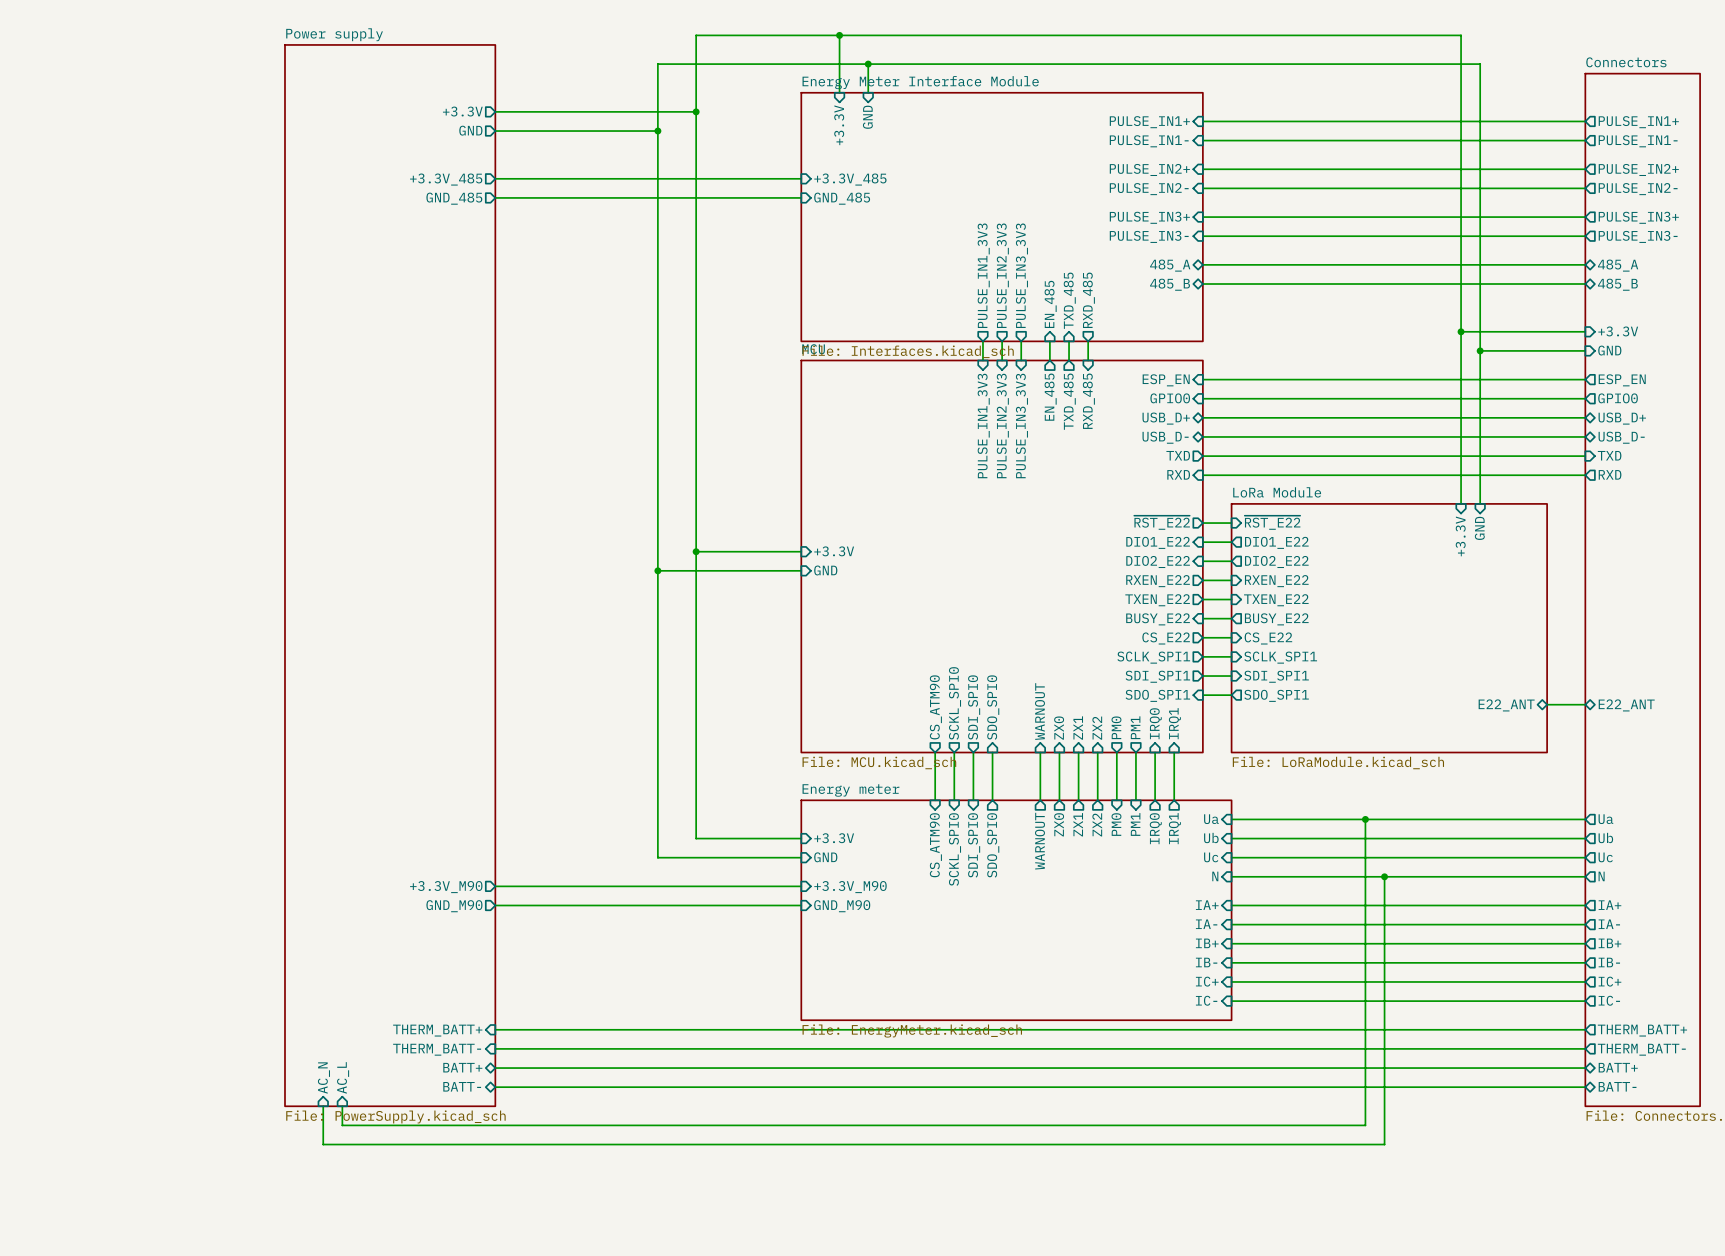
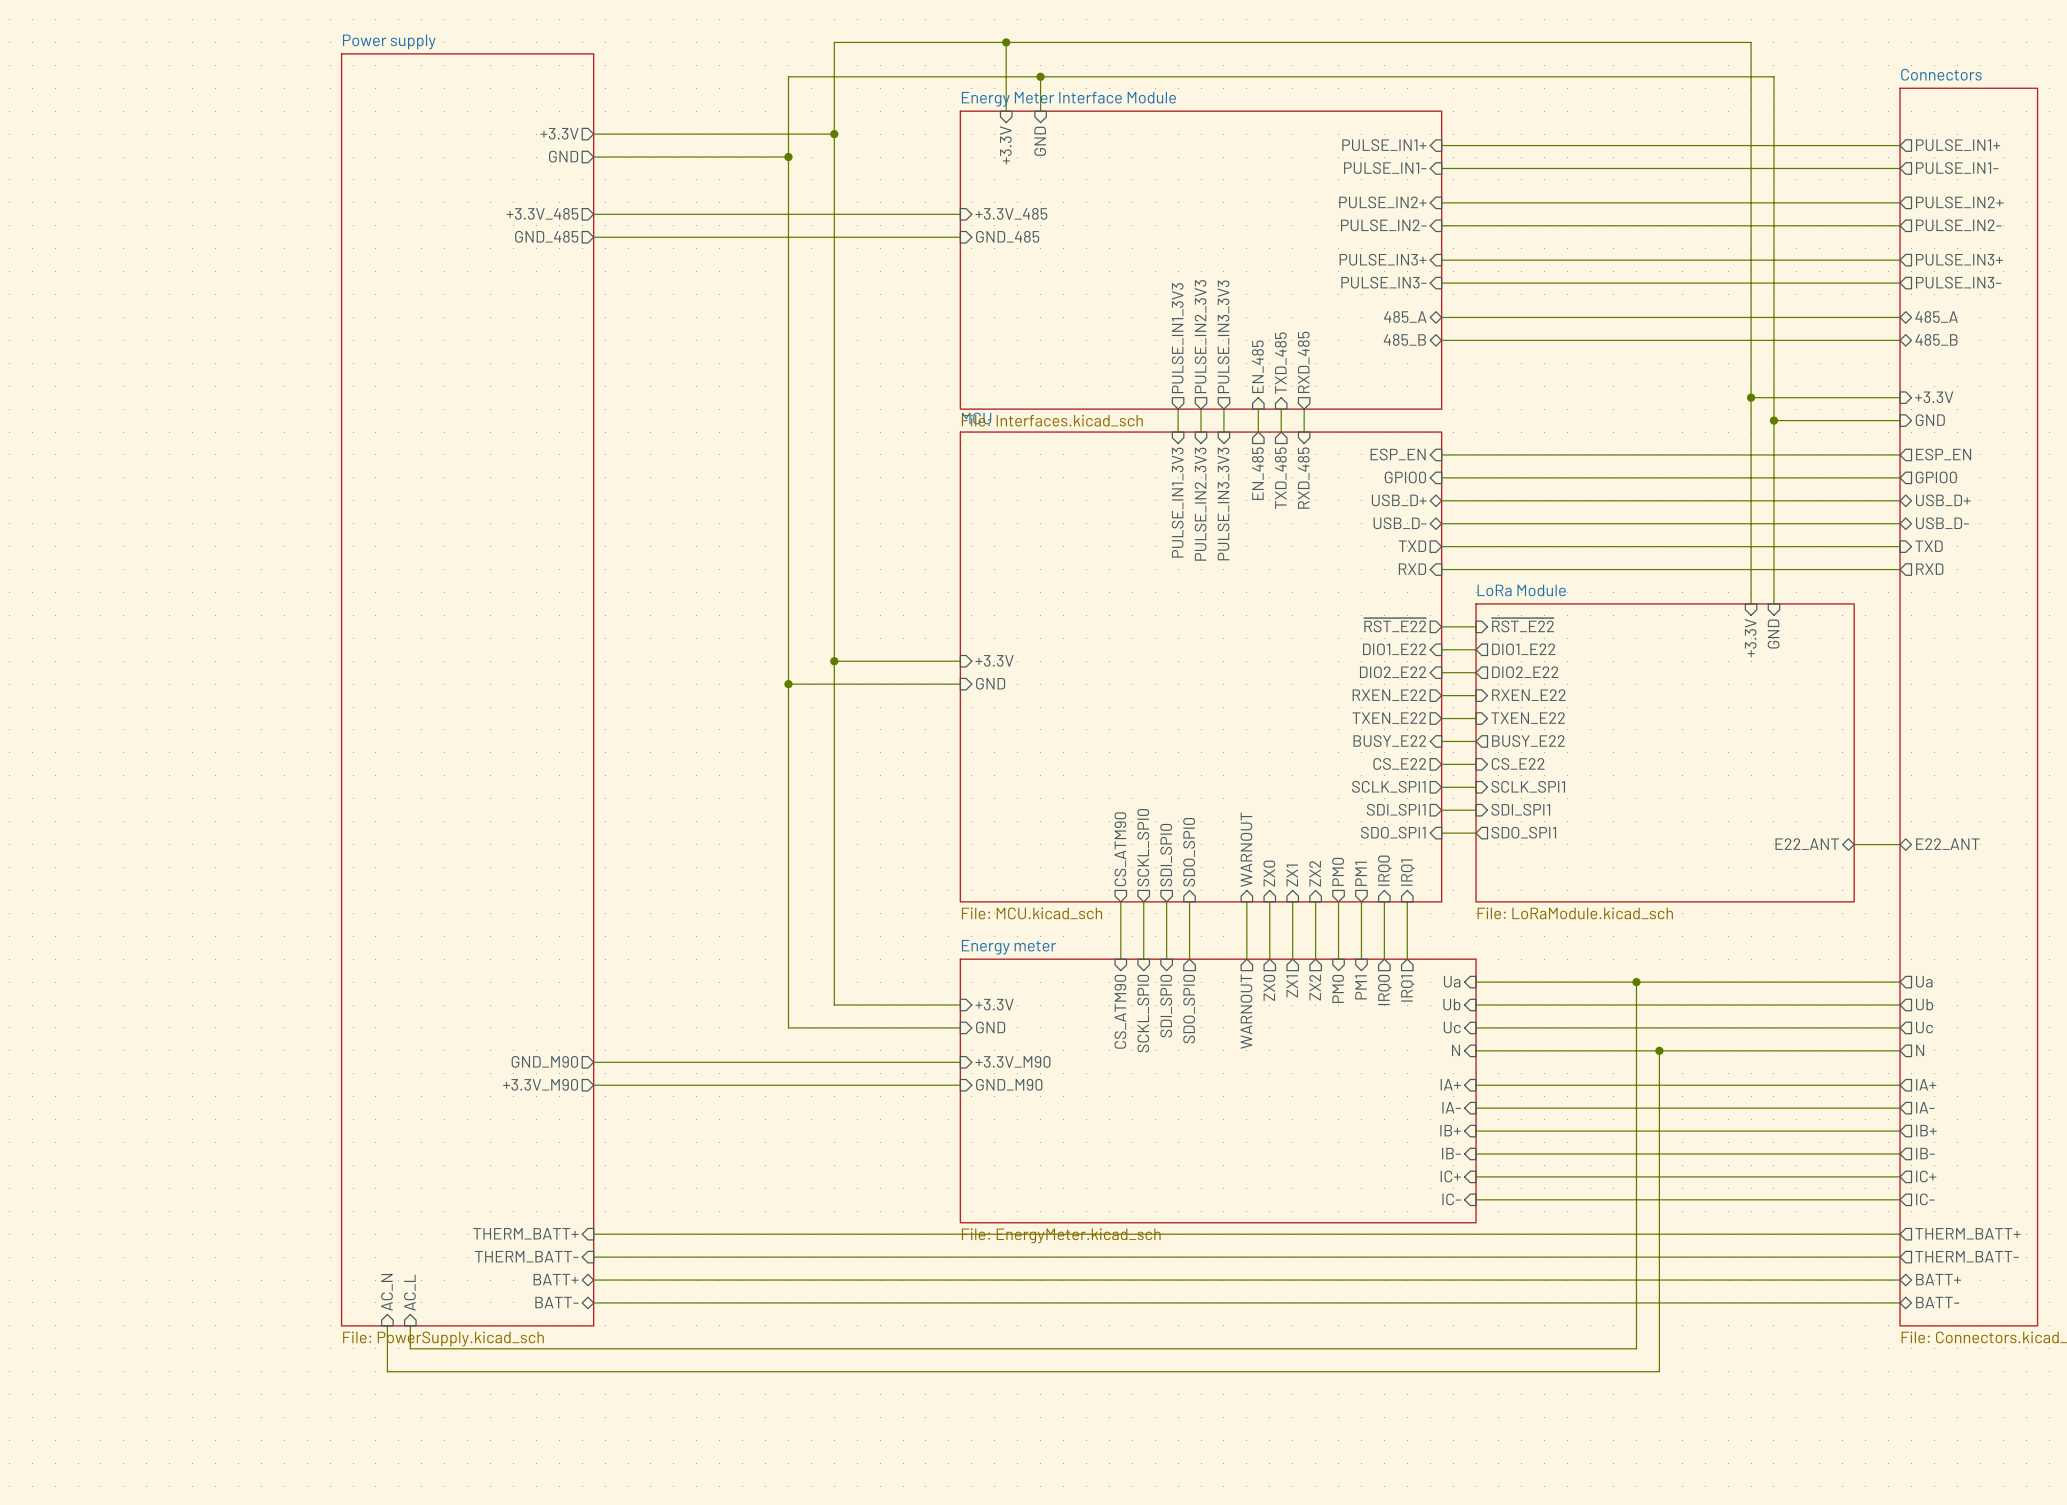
sheet pin: +3.3V_M90 (446, 887) -> GND_M90 (544, 1061)
sheet pin: GND_M90 (454, 906) -> +3.3V_M90 (540, 1084)

